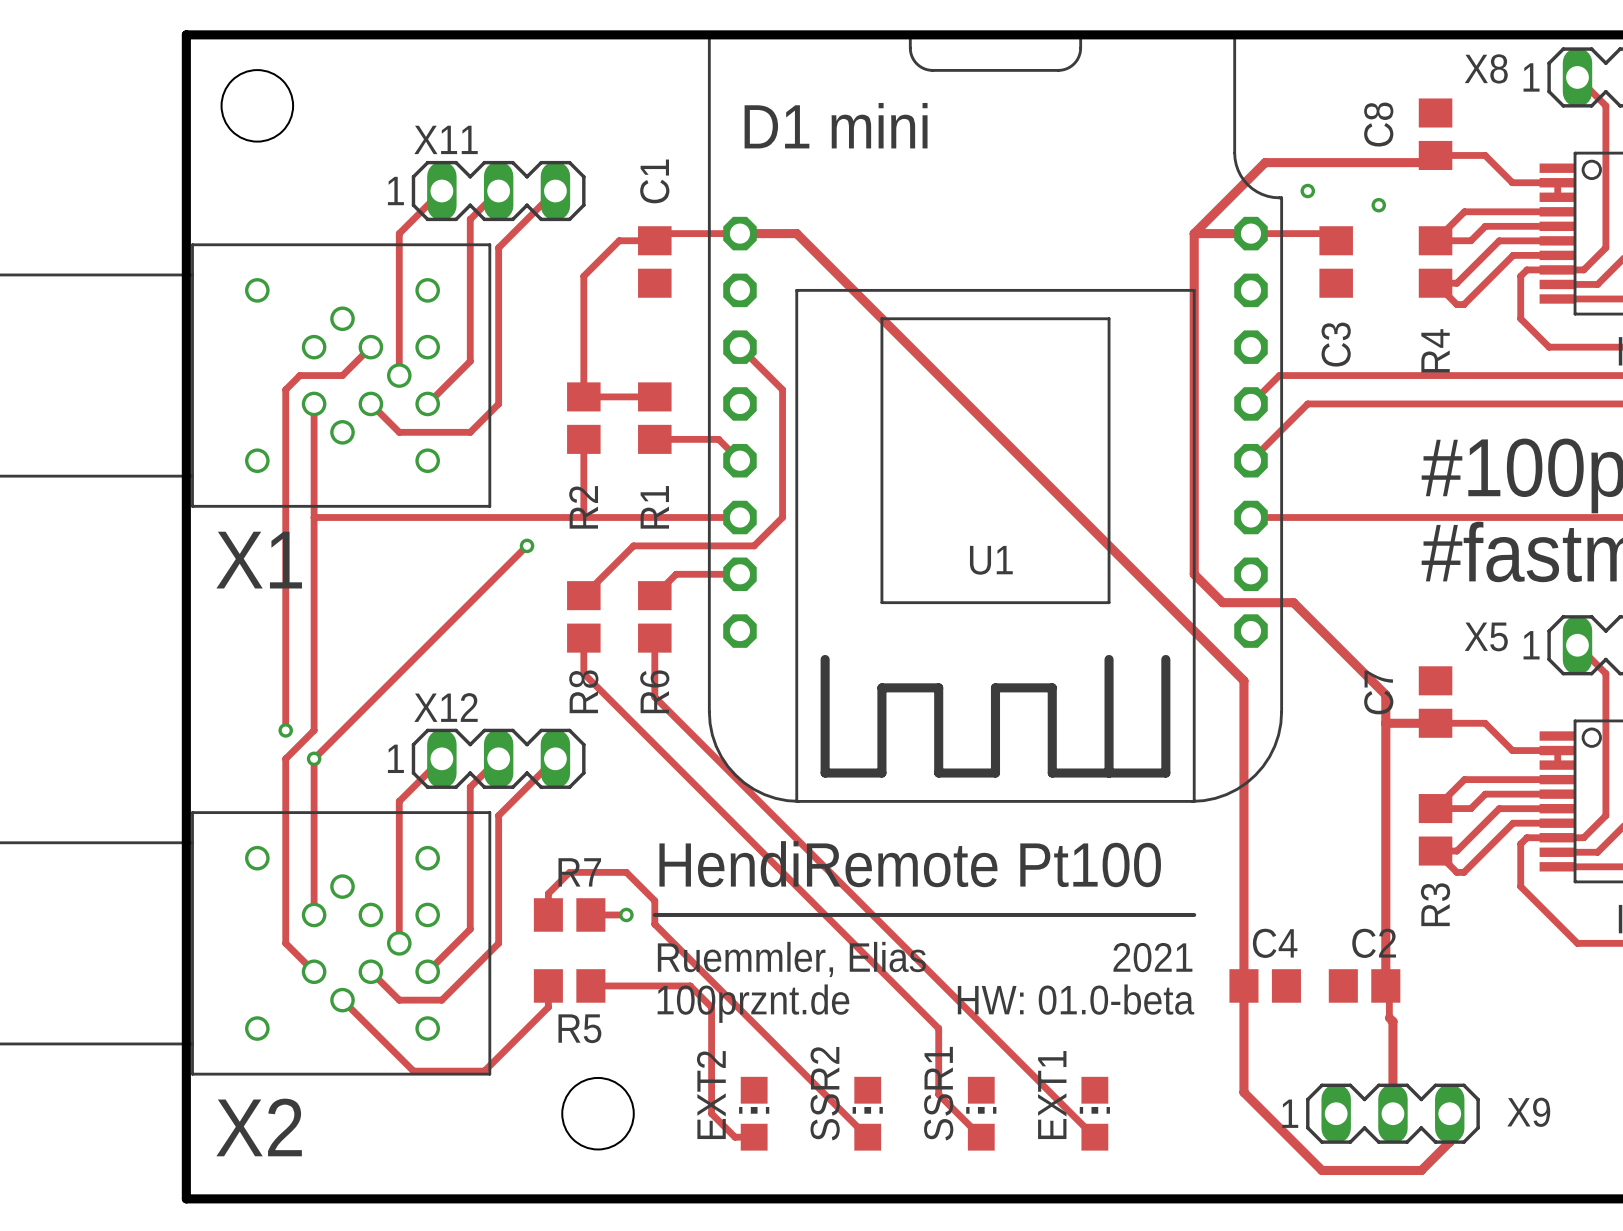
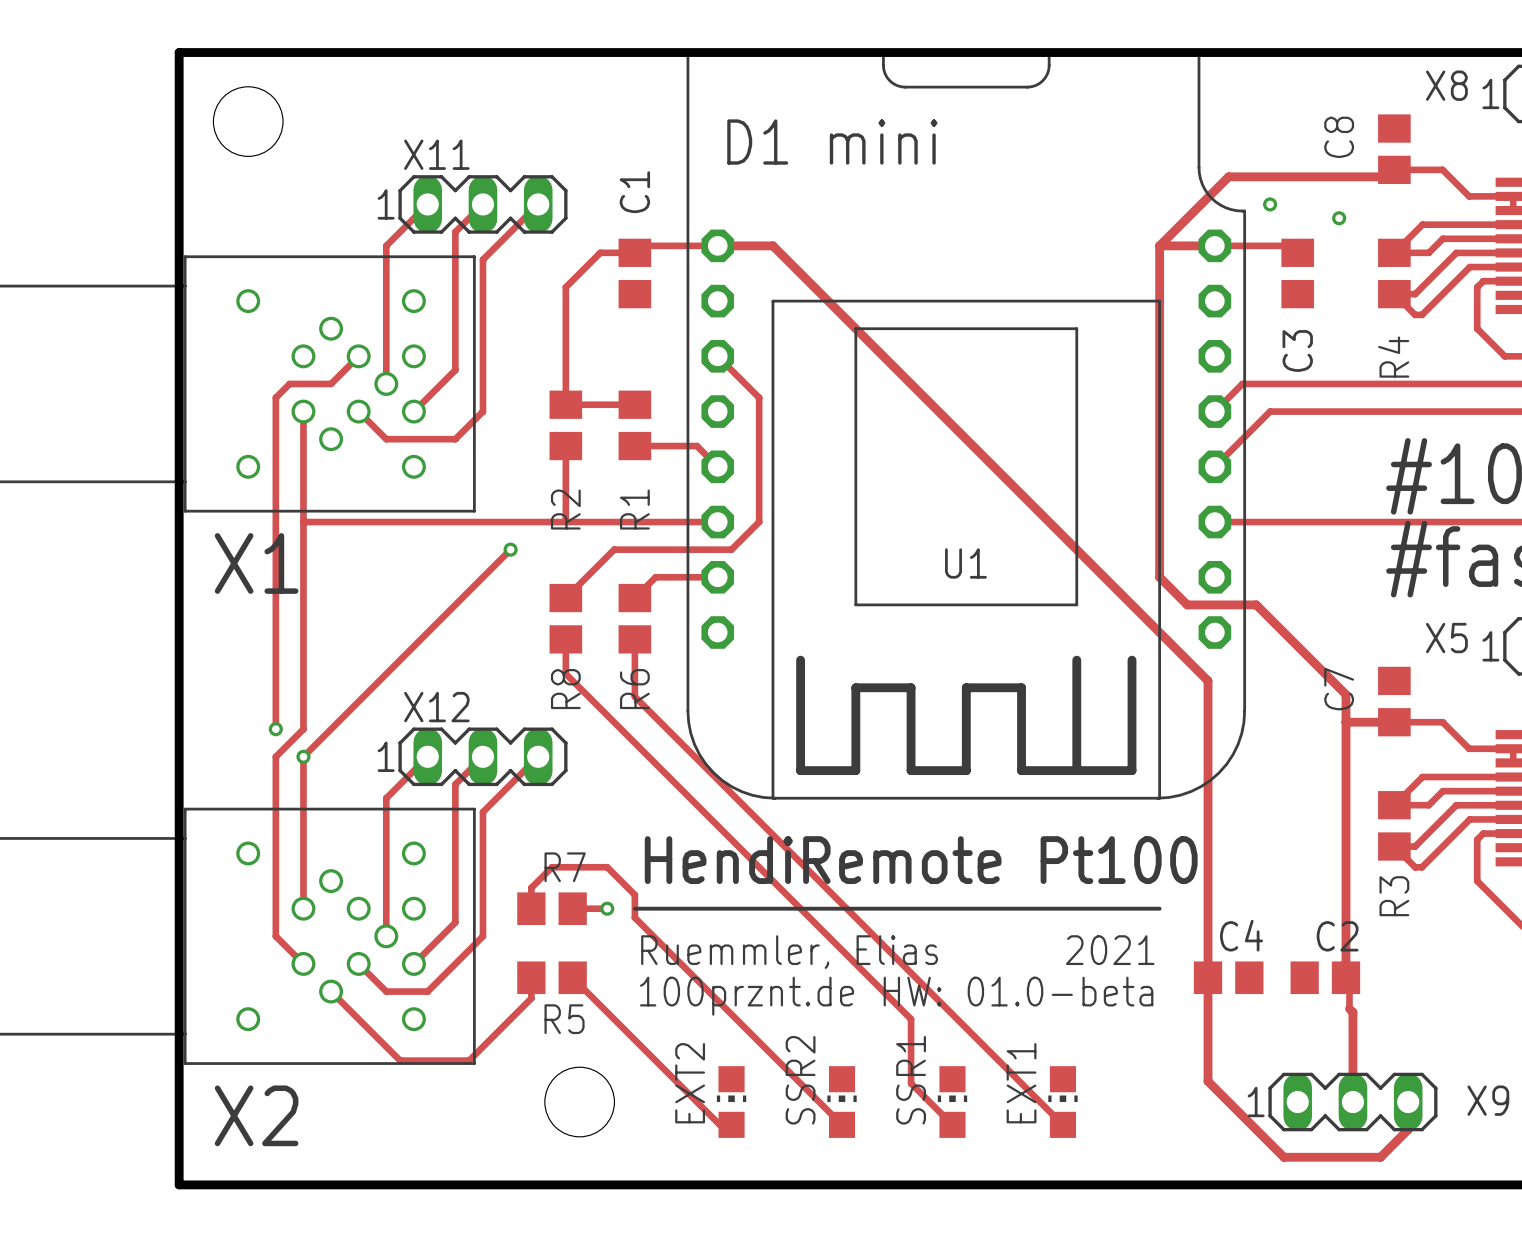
track: (590, 985) (690, 985) (711, 1007) (711, 1113) (735, 1137) (742, 1137) -> (572, 977) (719, 1124)

